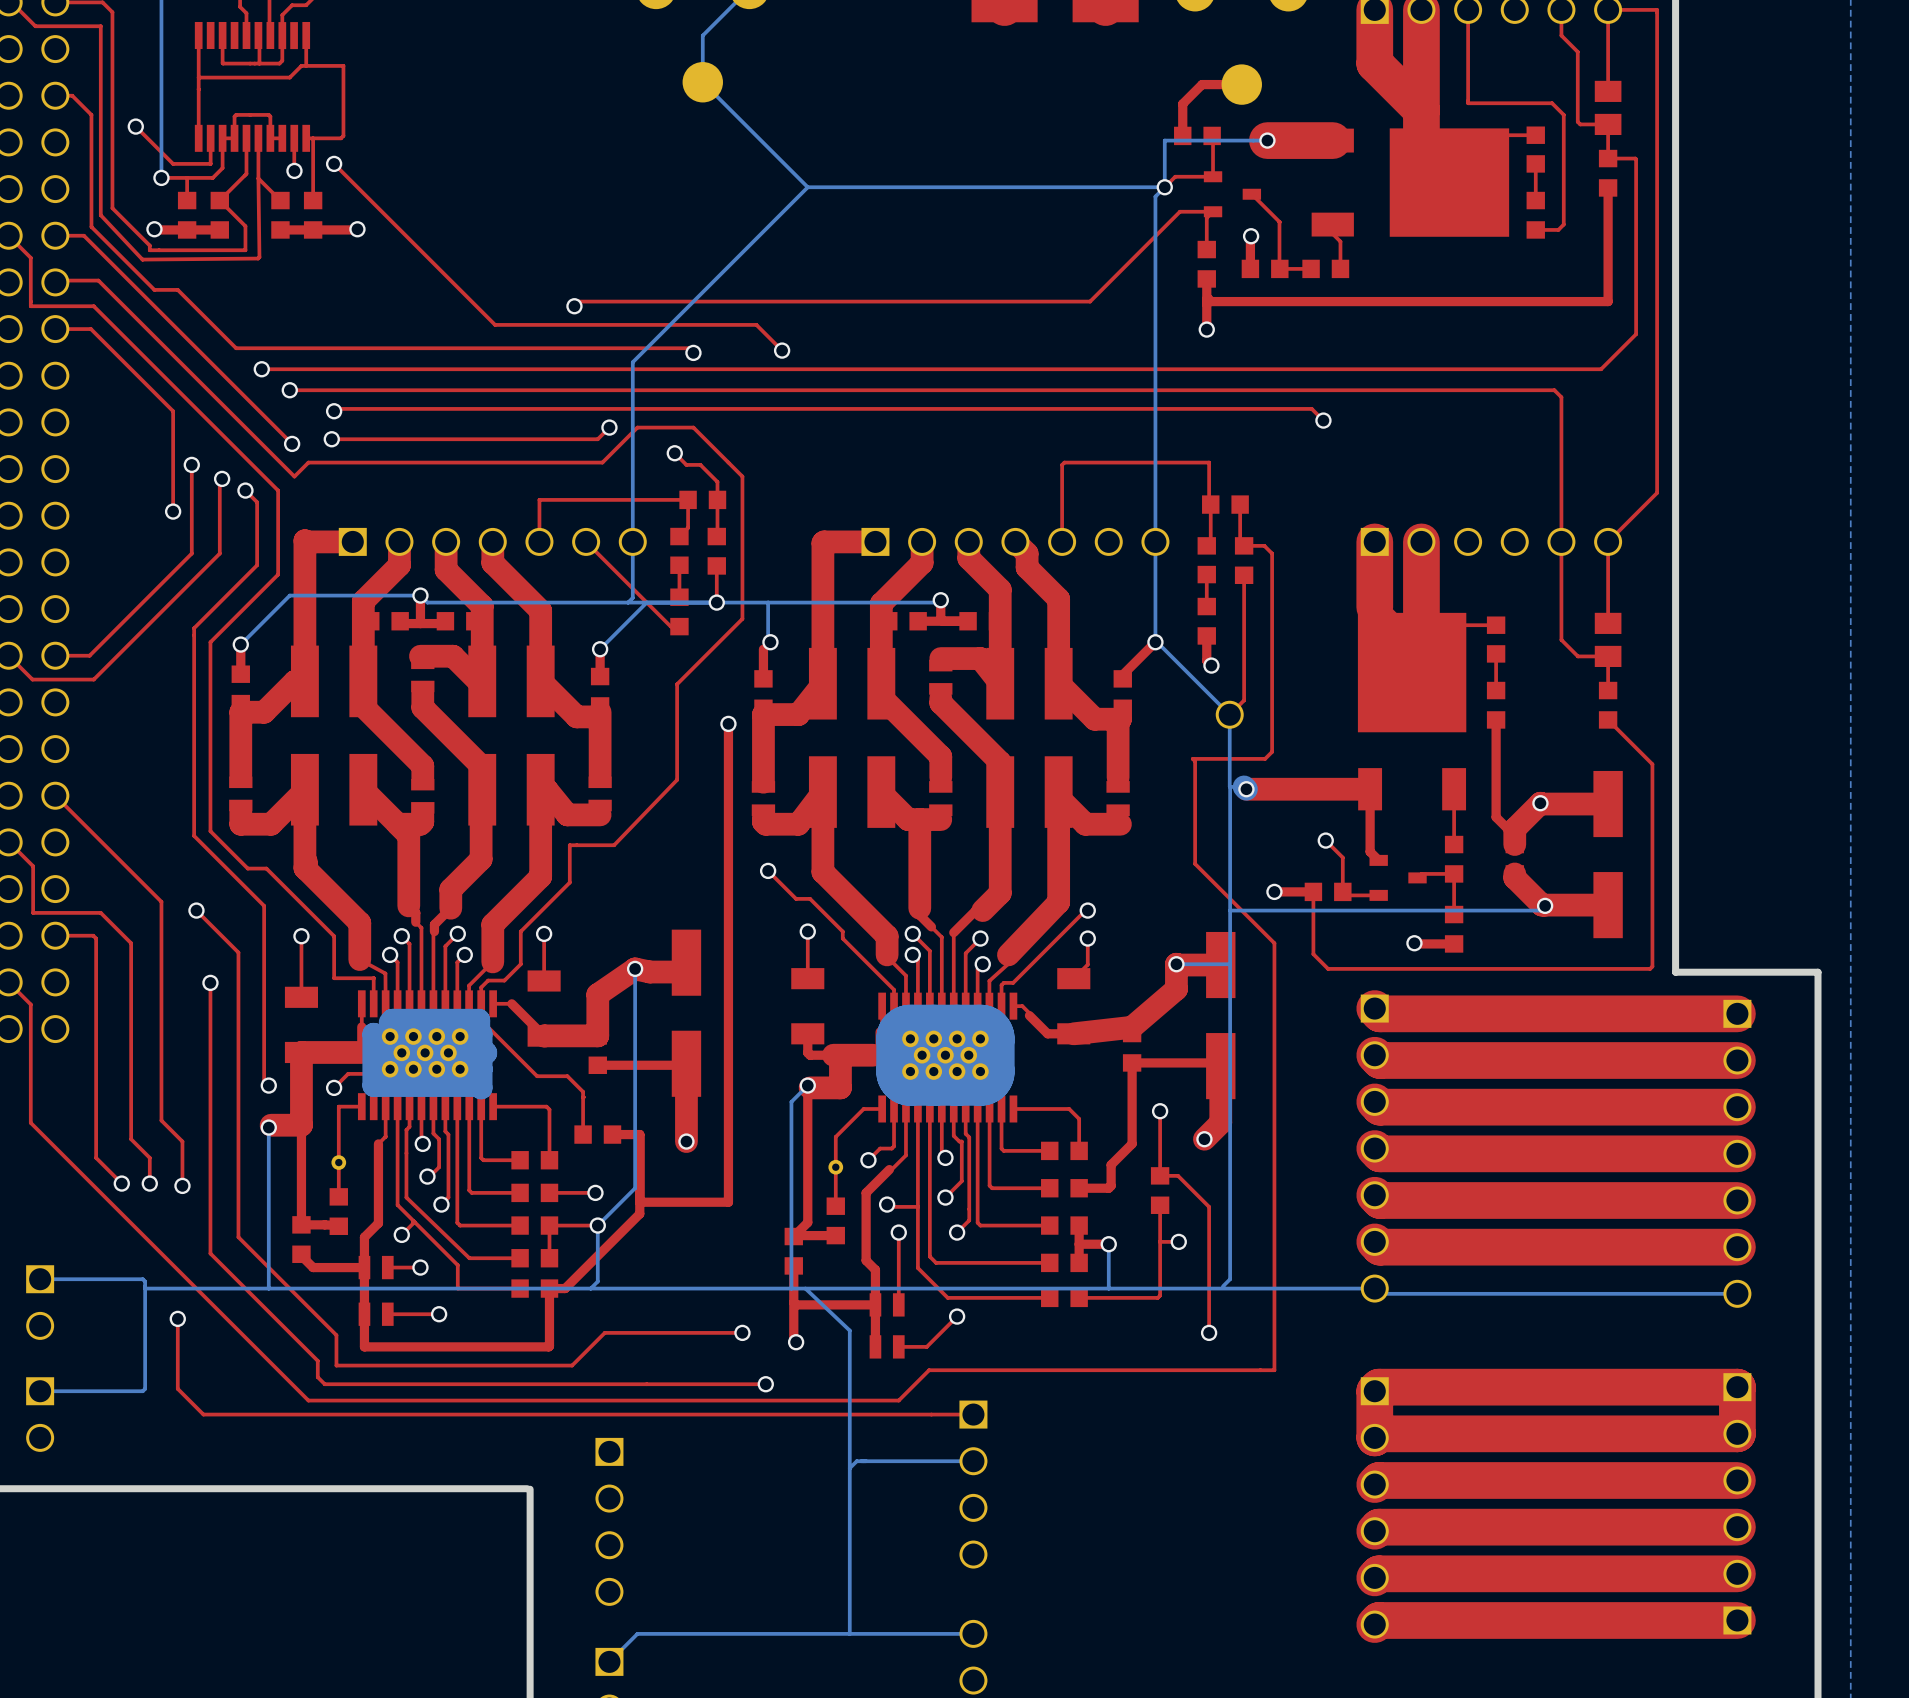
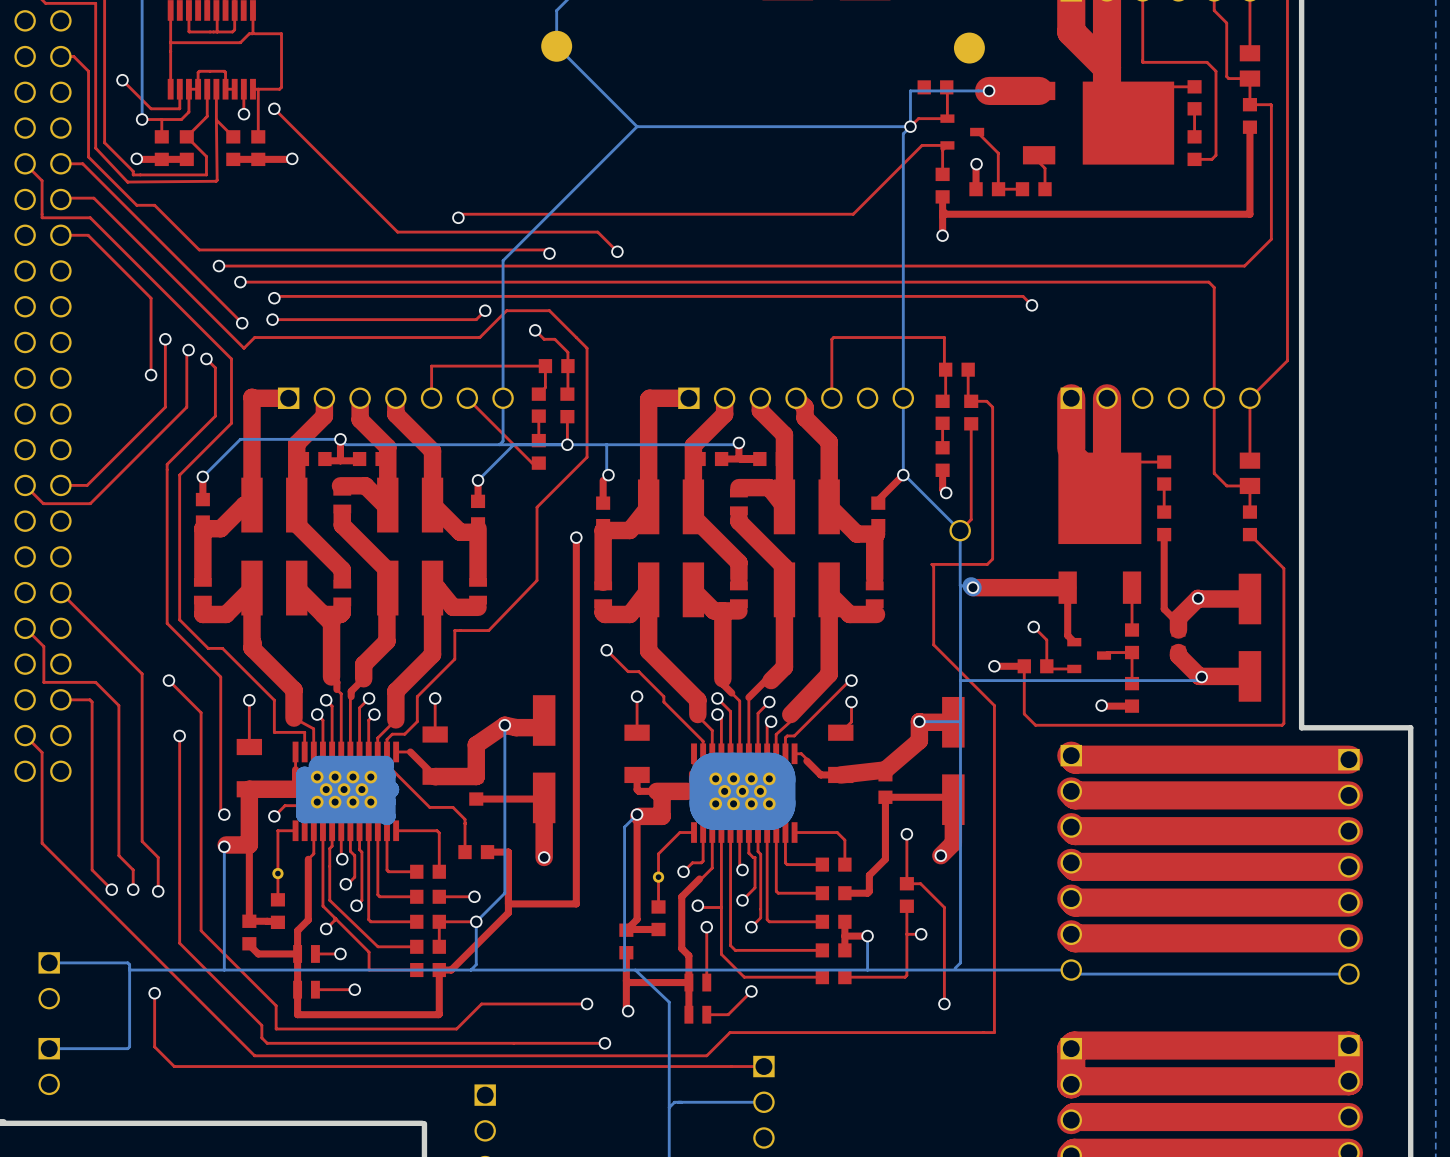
top track: (1241, 84) (1202, 84) (1182, 103) (1182, 135) -> none

